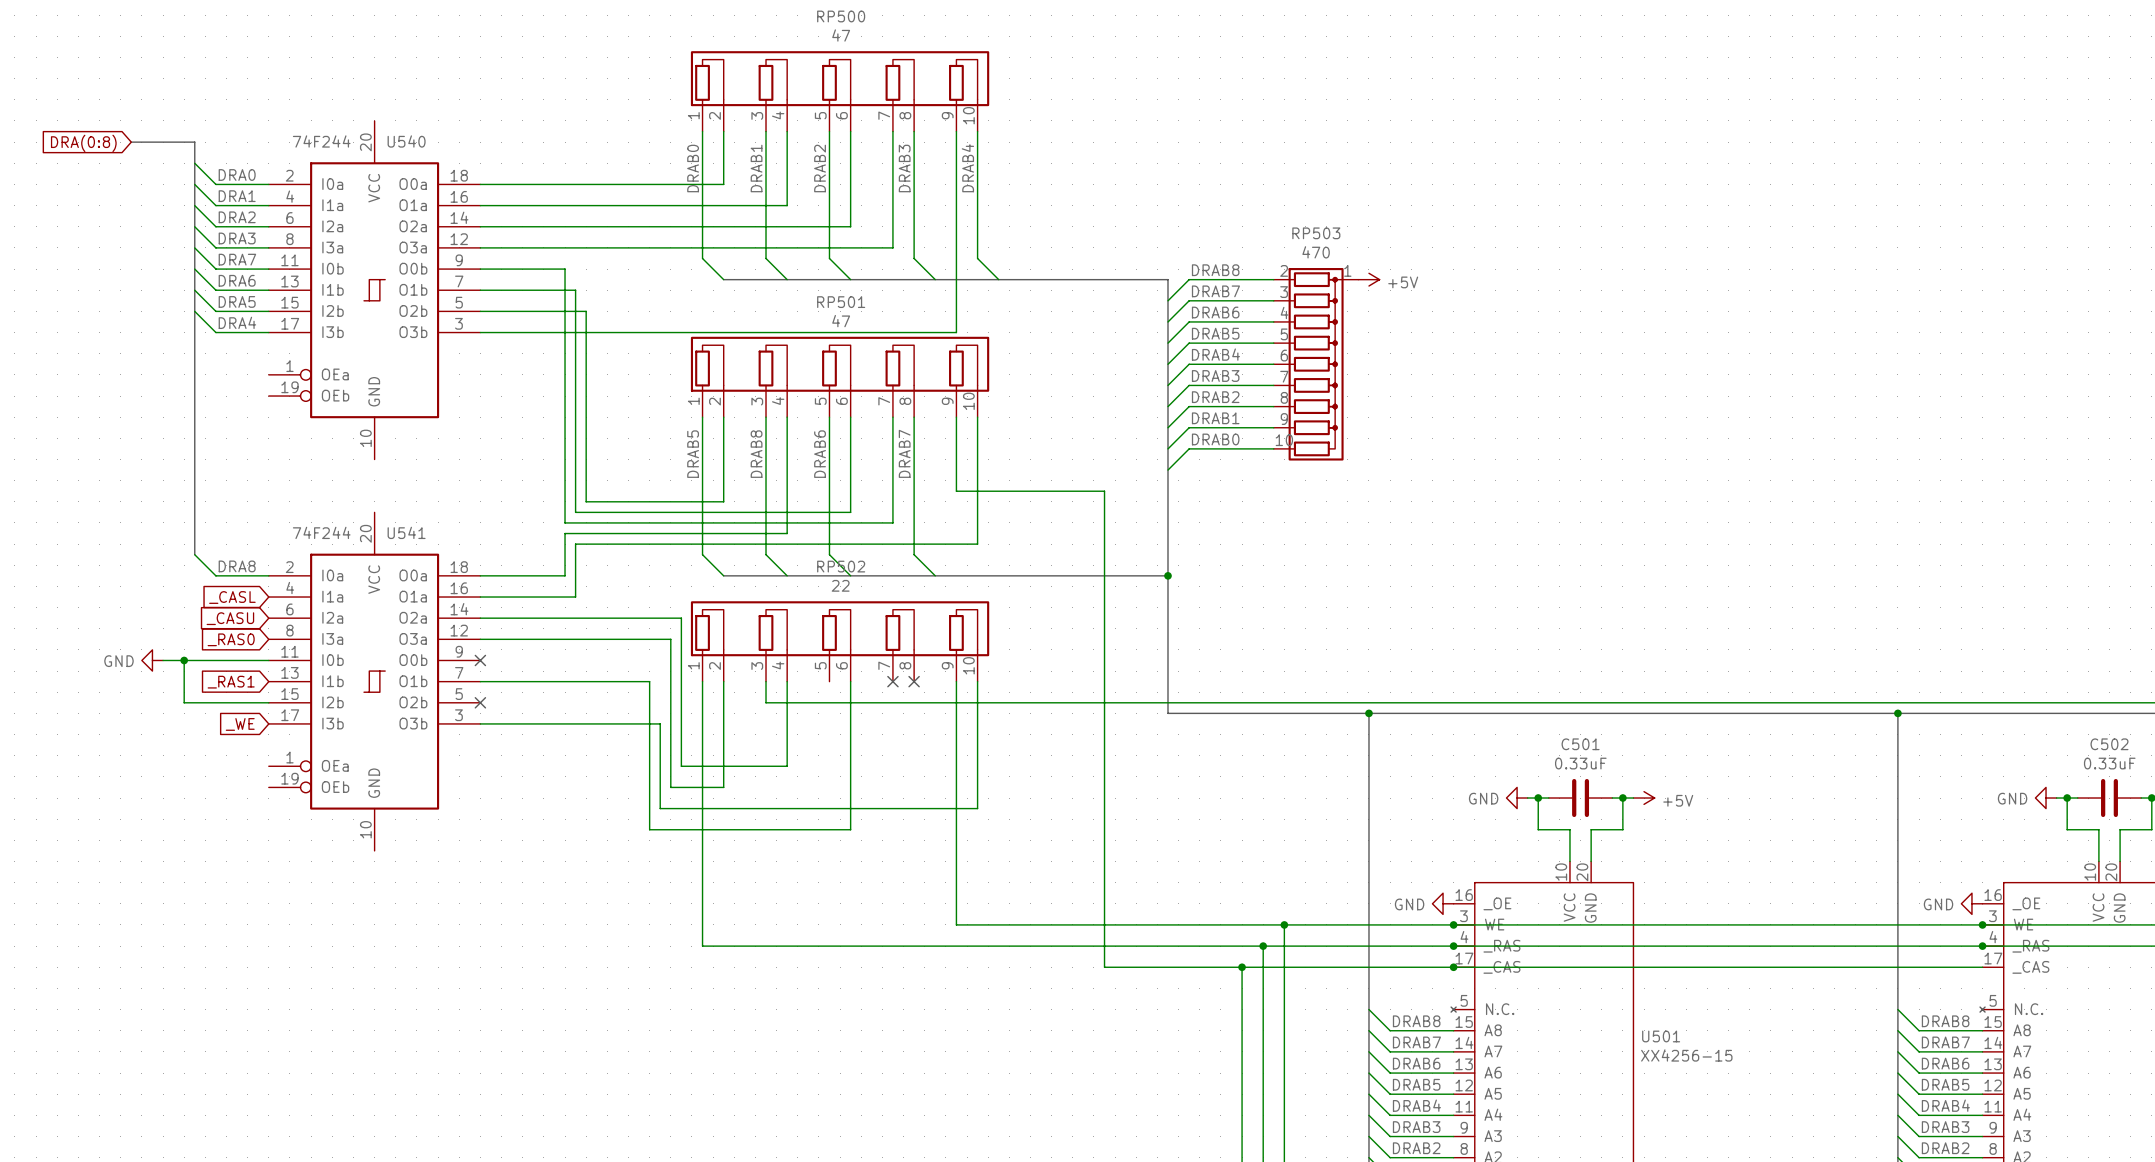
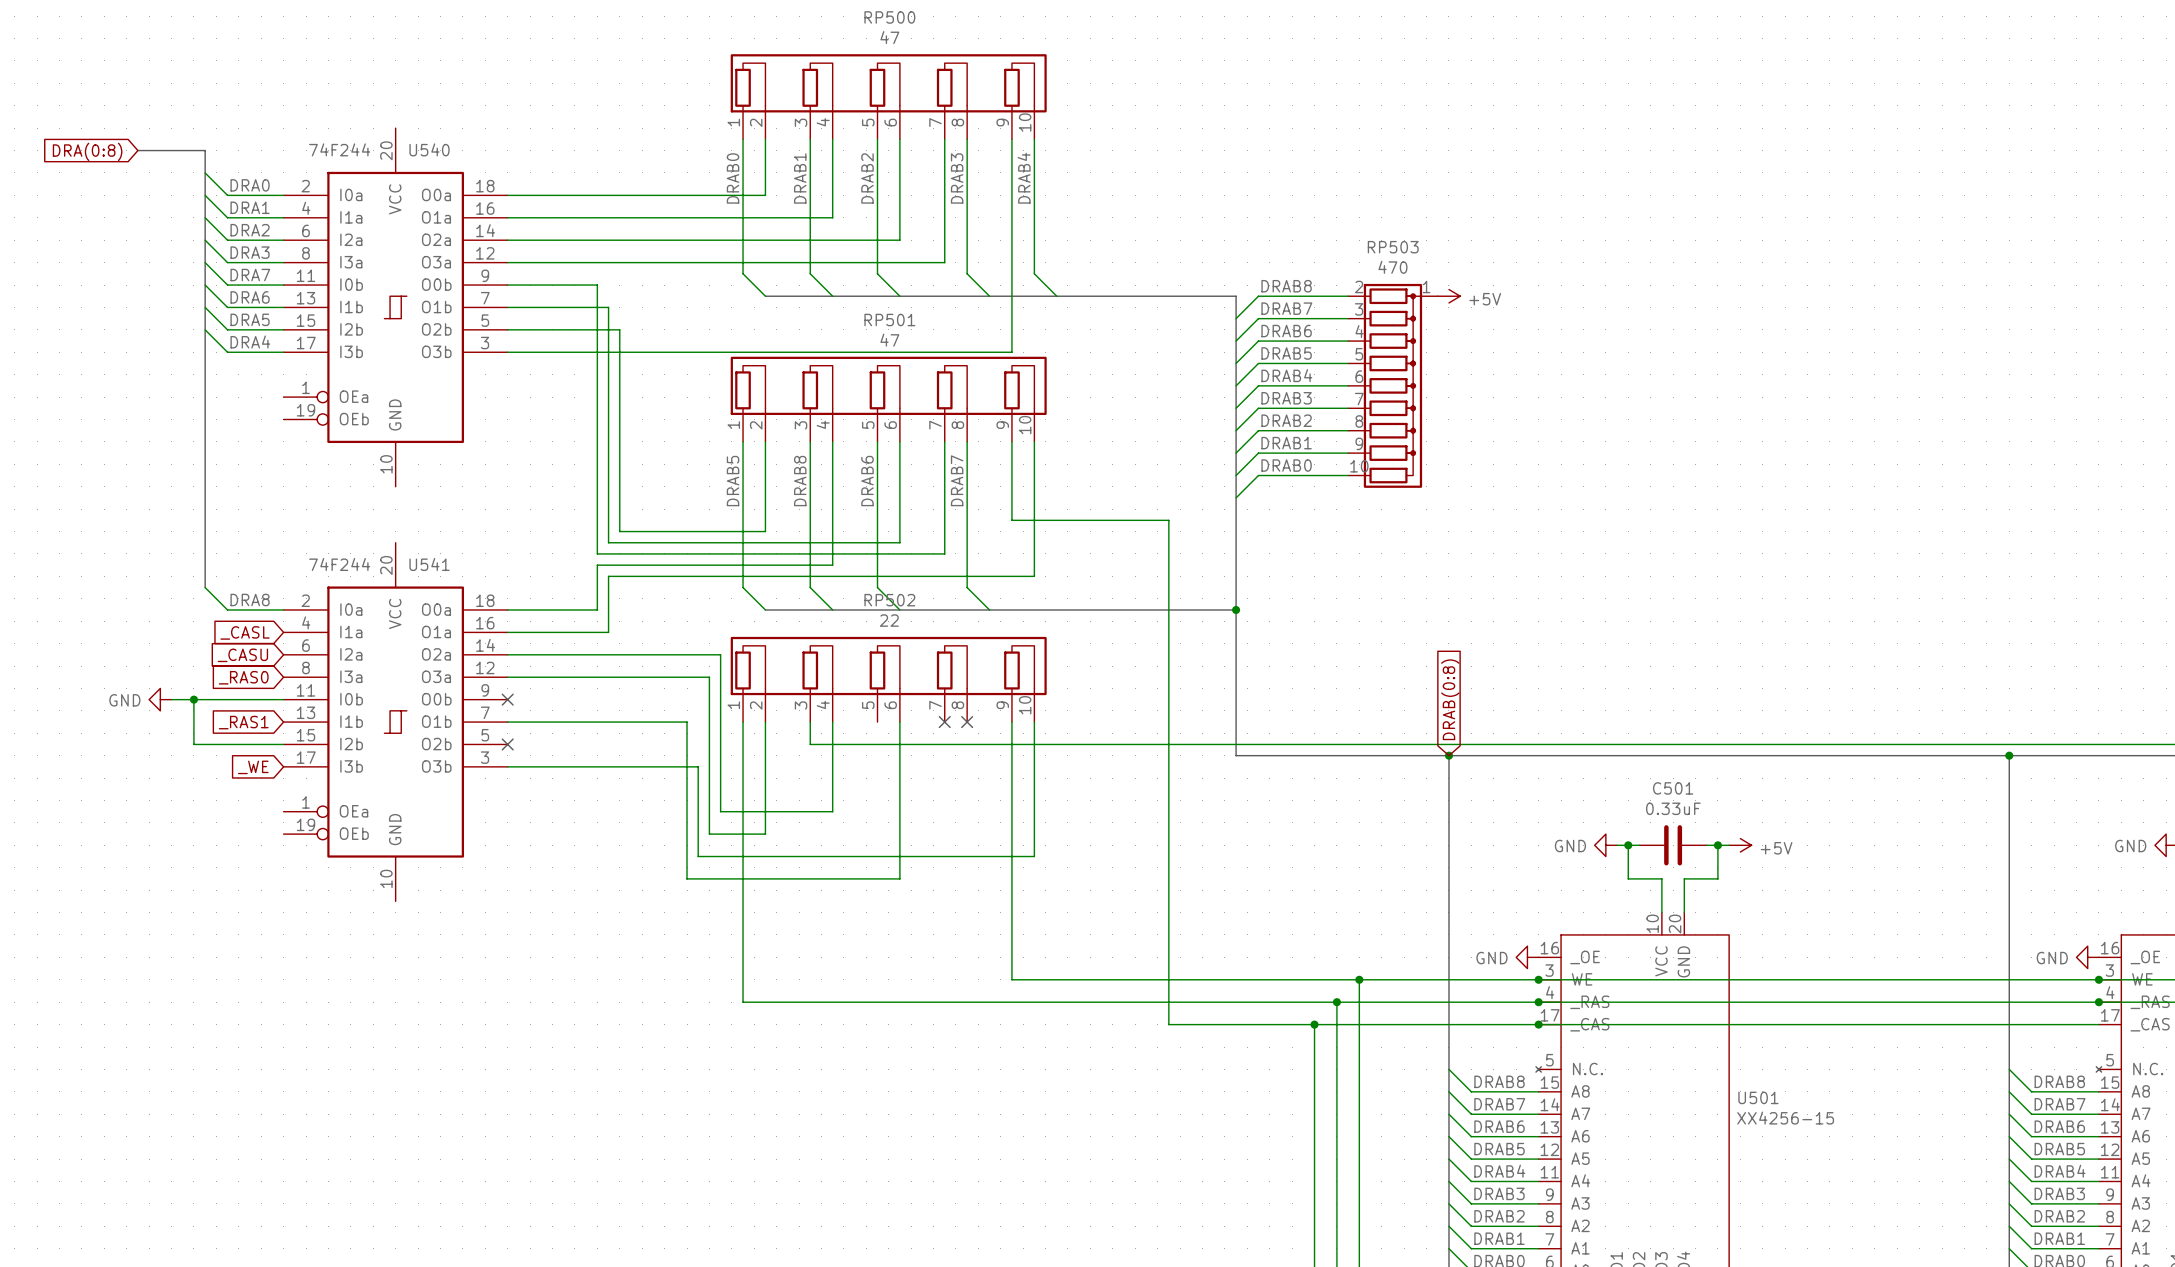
global label: none -> DRAB(0:8) (1450, 699)

